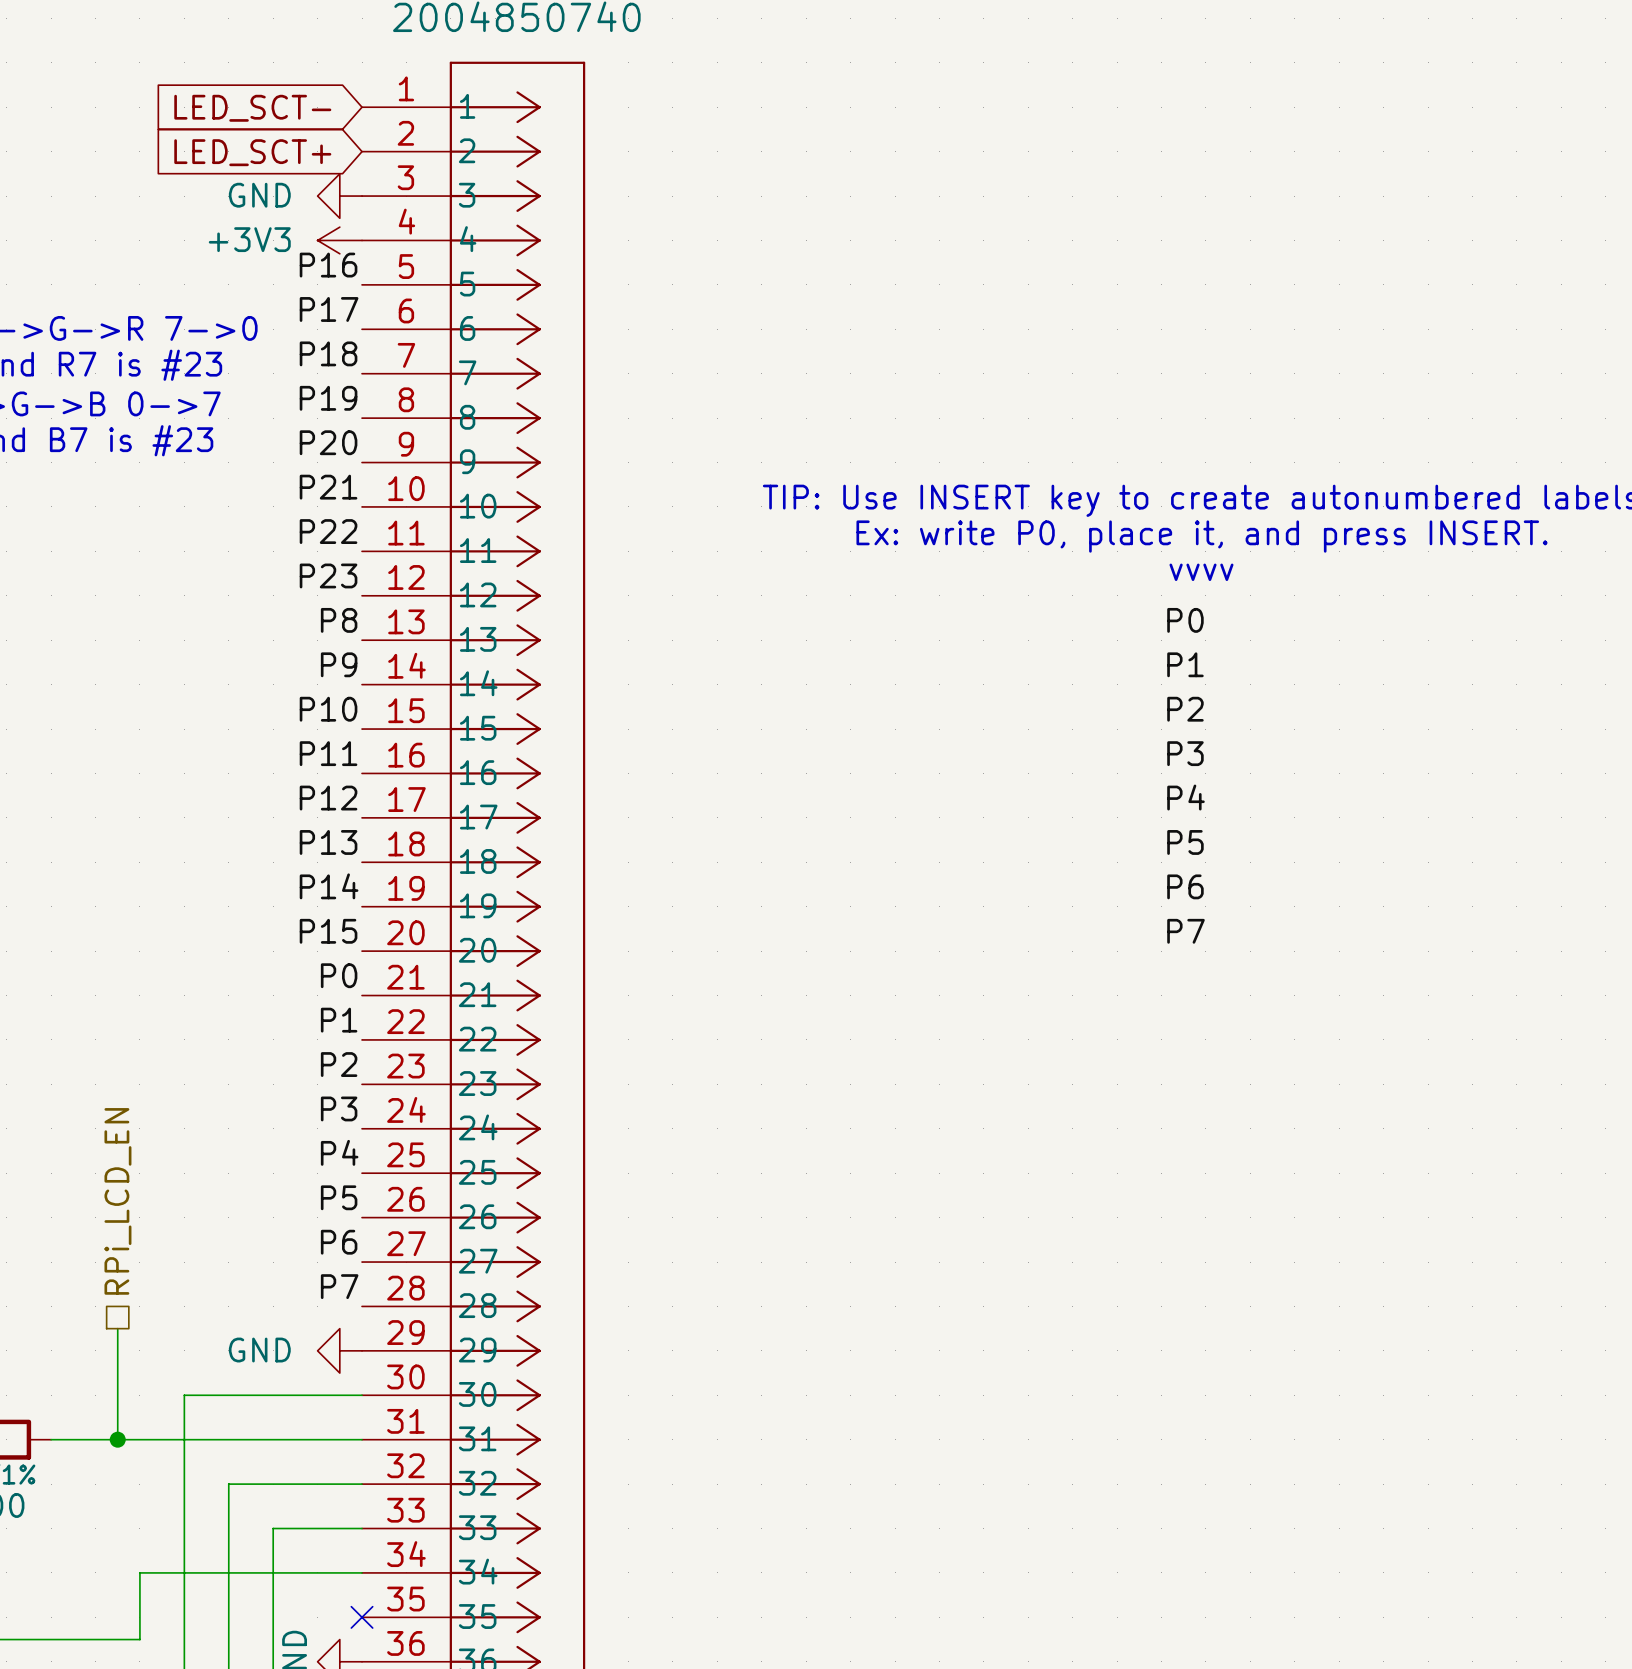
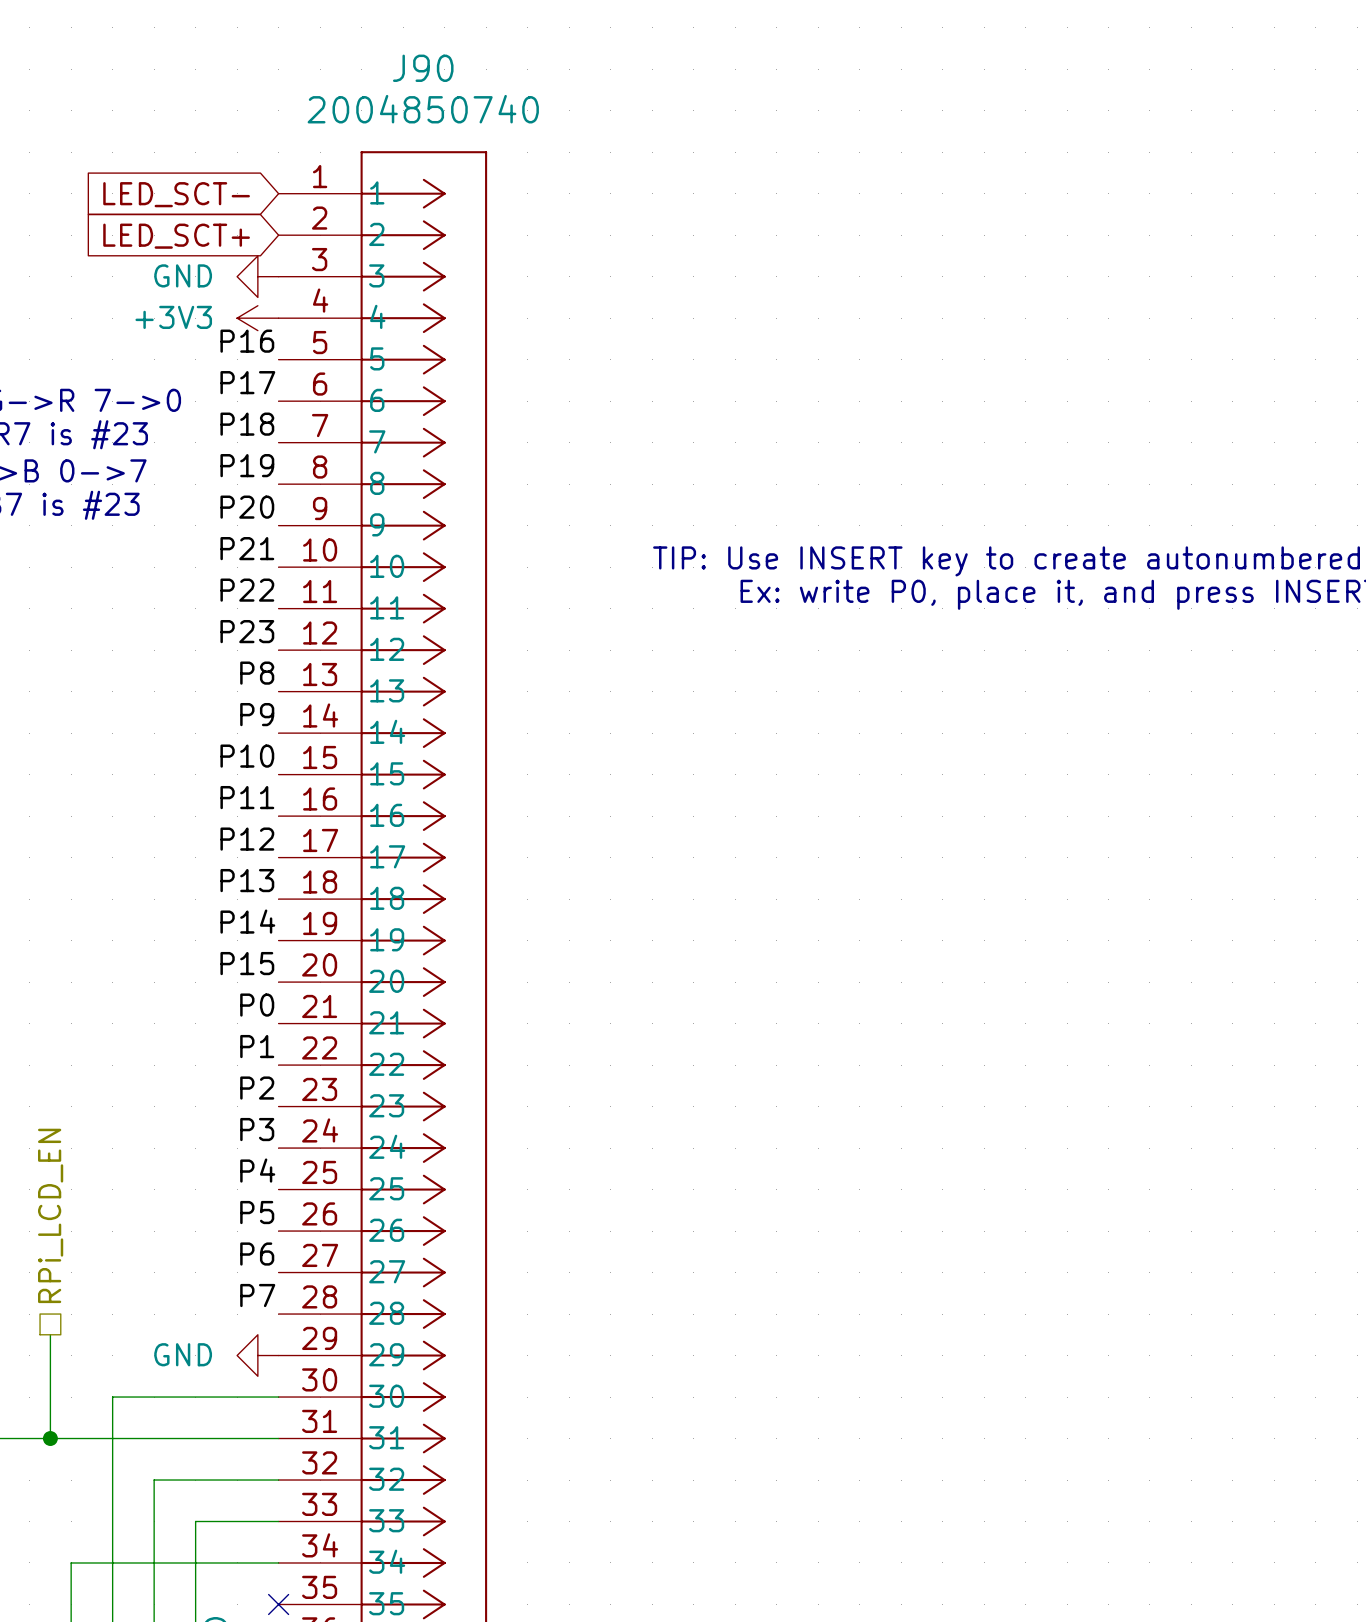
text: vvvv (1201, 572) -> none
label: P0 (1185, 620) -> none
label: P1 (1185, 664) -> none
label: P2 (1185, 709) -> none
label: P3 (1185, 753) -> none
label: P4 (1185, 797) -> none
label: P5 (1185, 842) -> none
label: P6 (1185, 886) -> none
label: P7 (1185, 931) -> none

